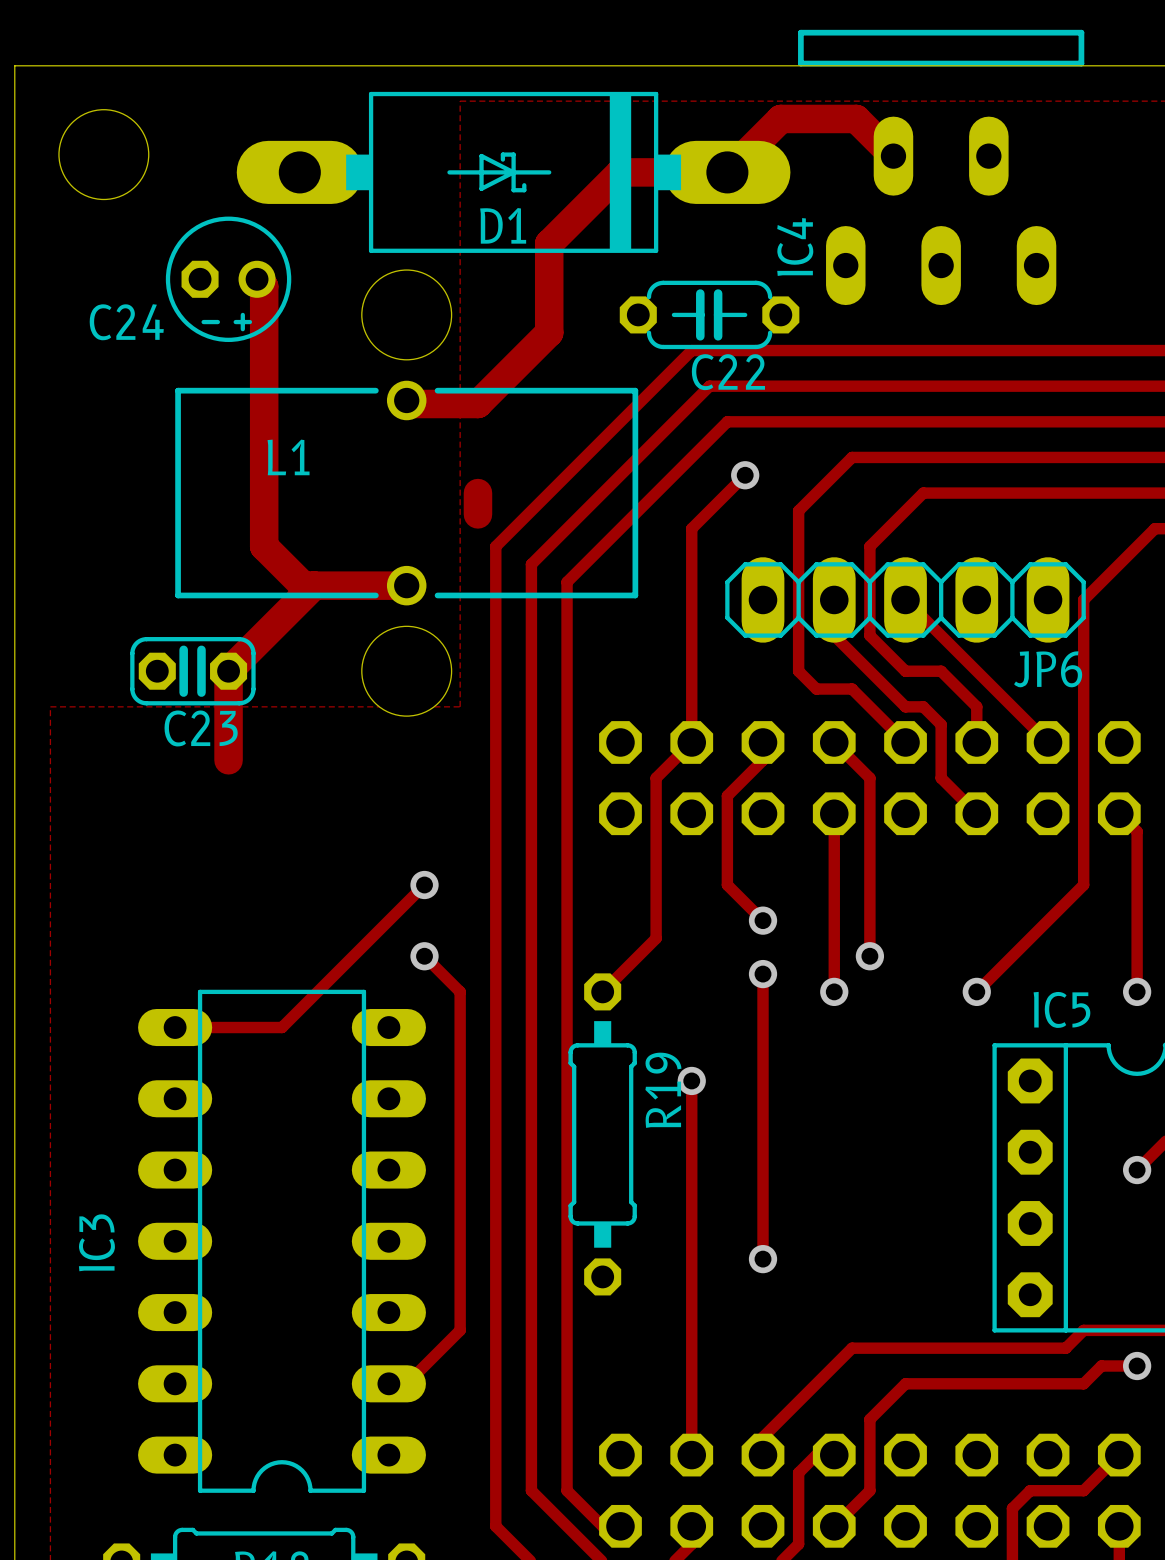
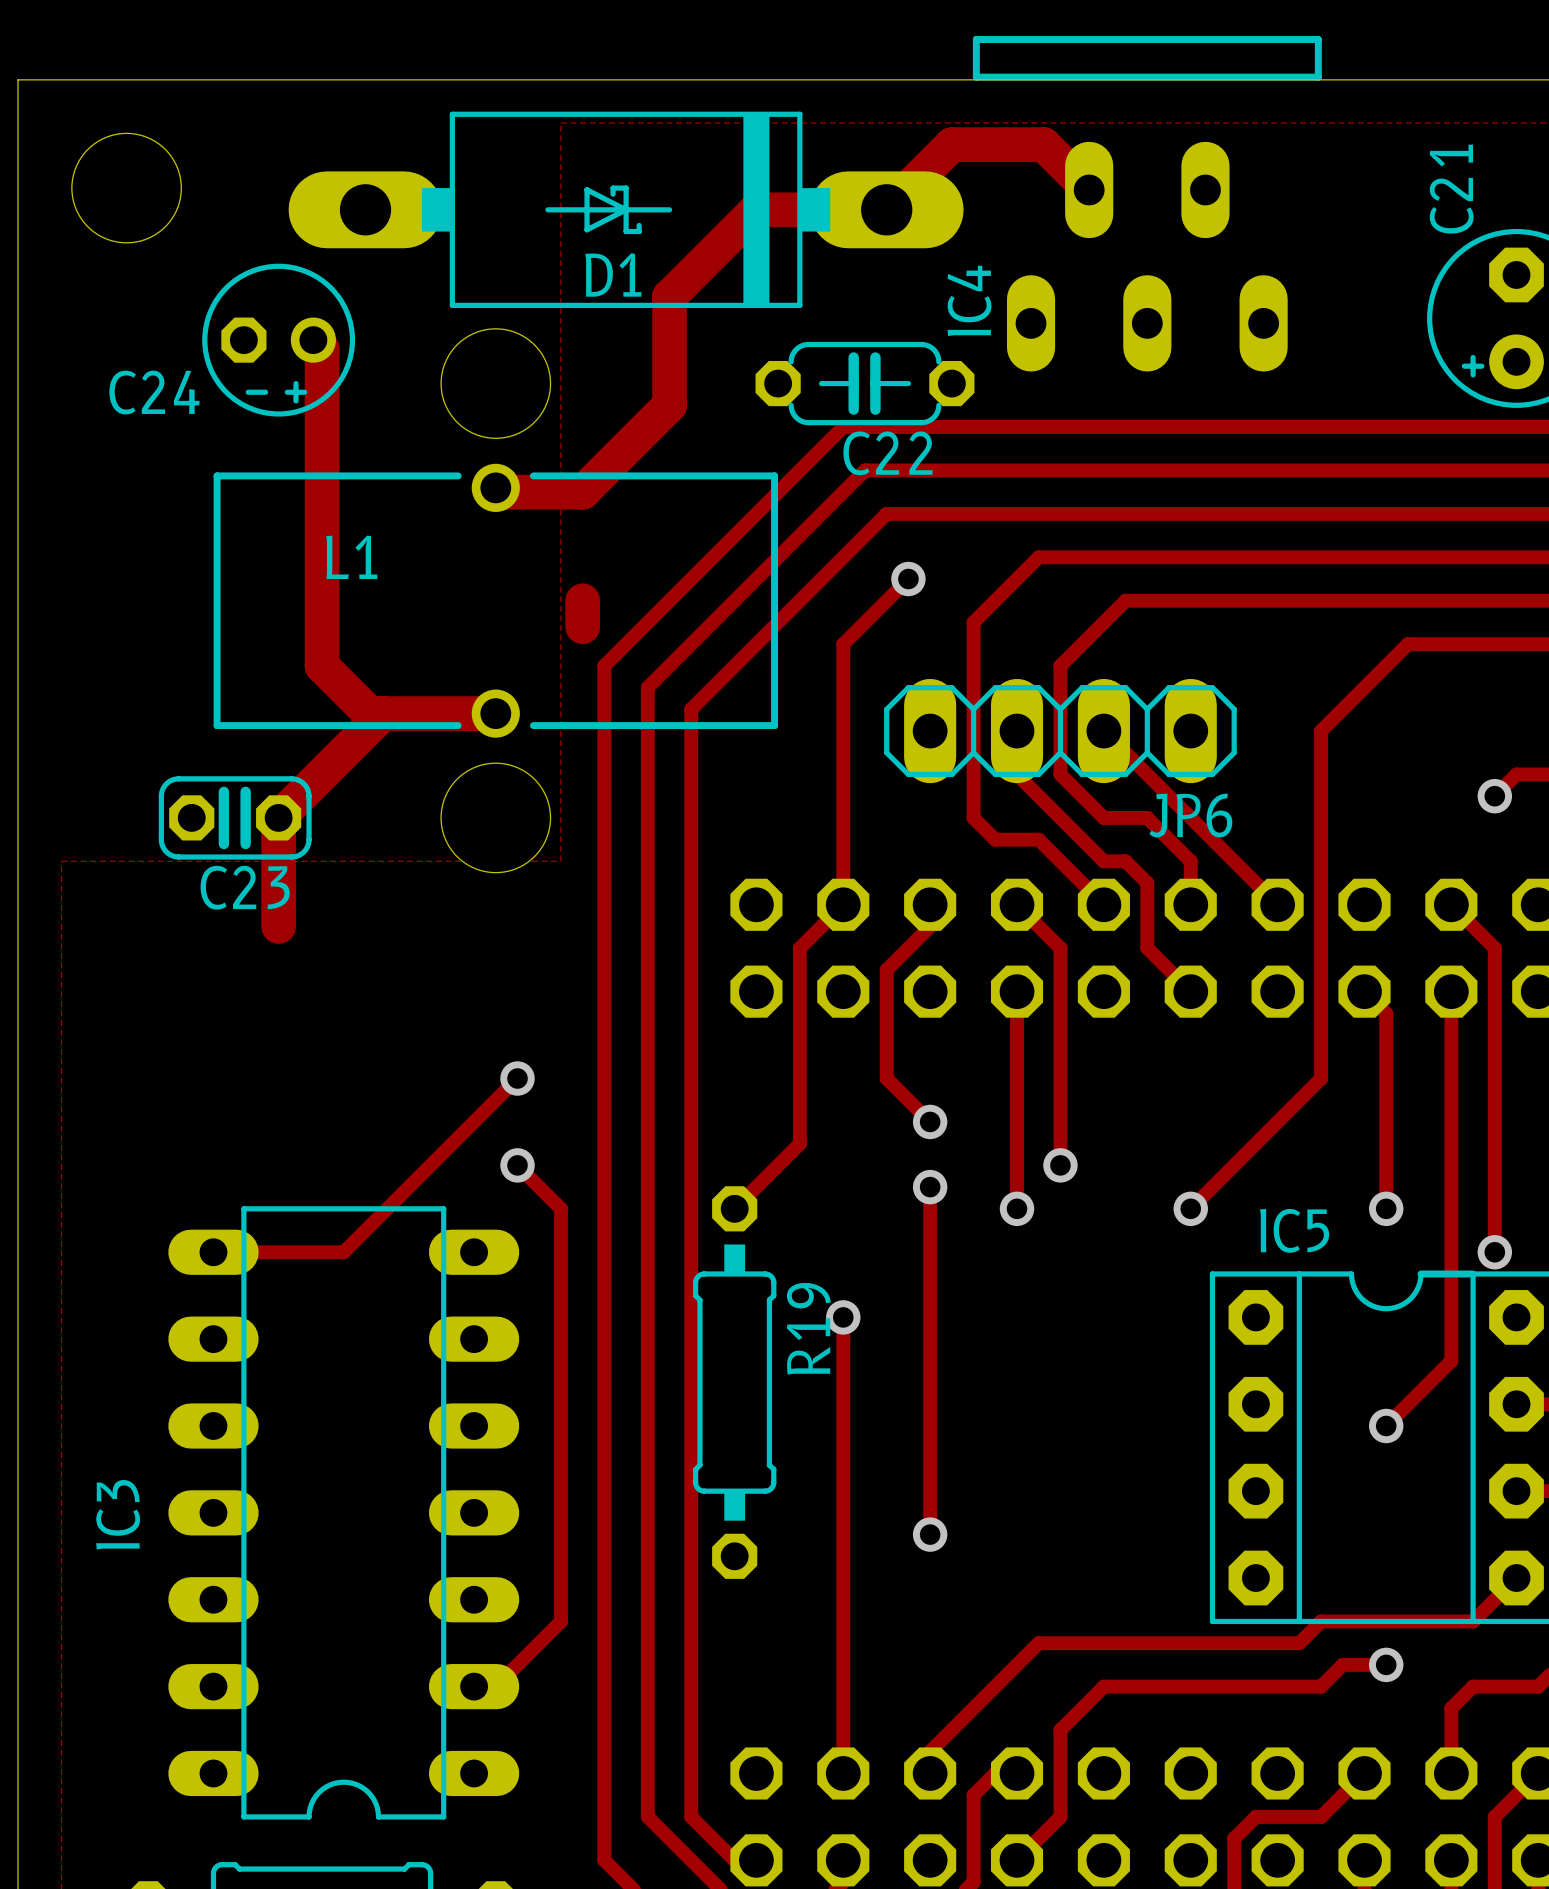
JP6 footprint: [725, 557, 1086, 643] -> [884, 678, 1237, 784]

